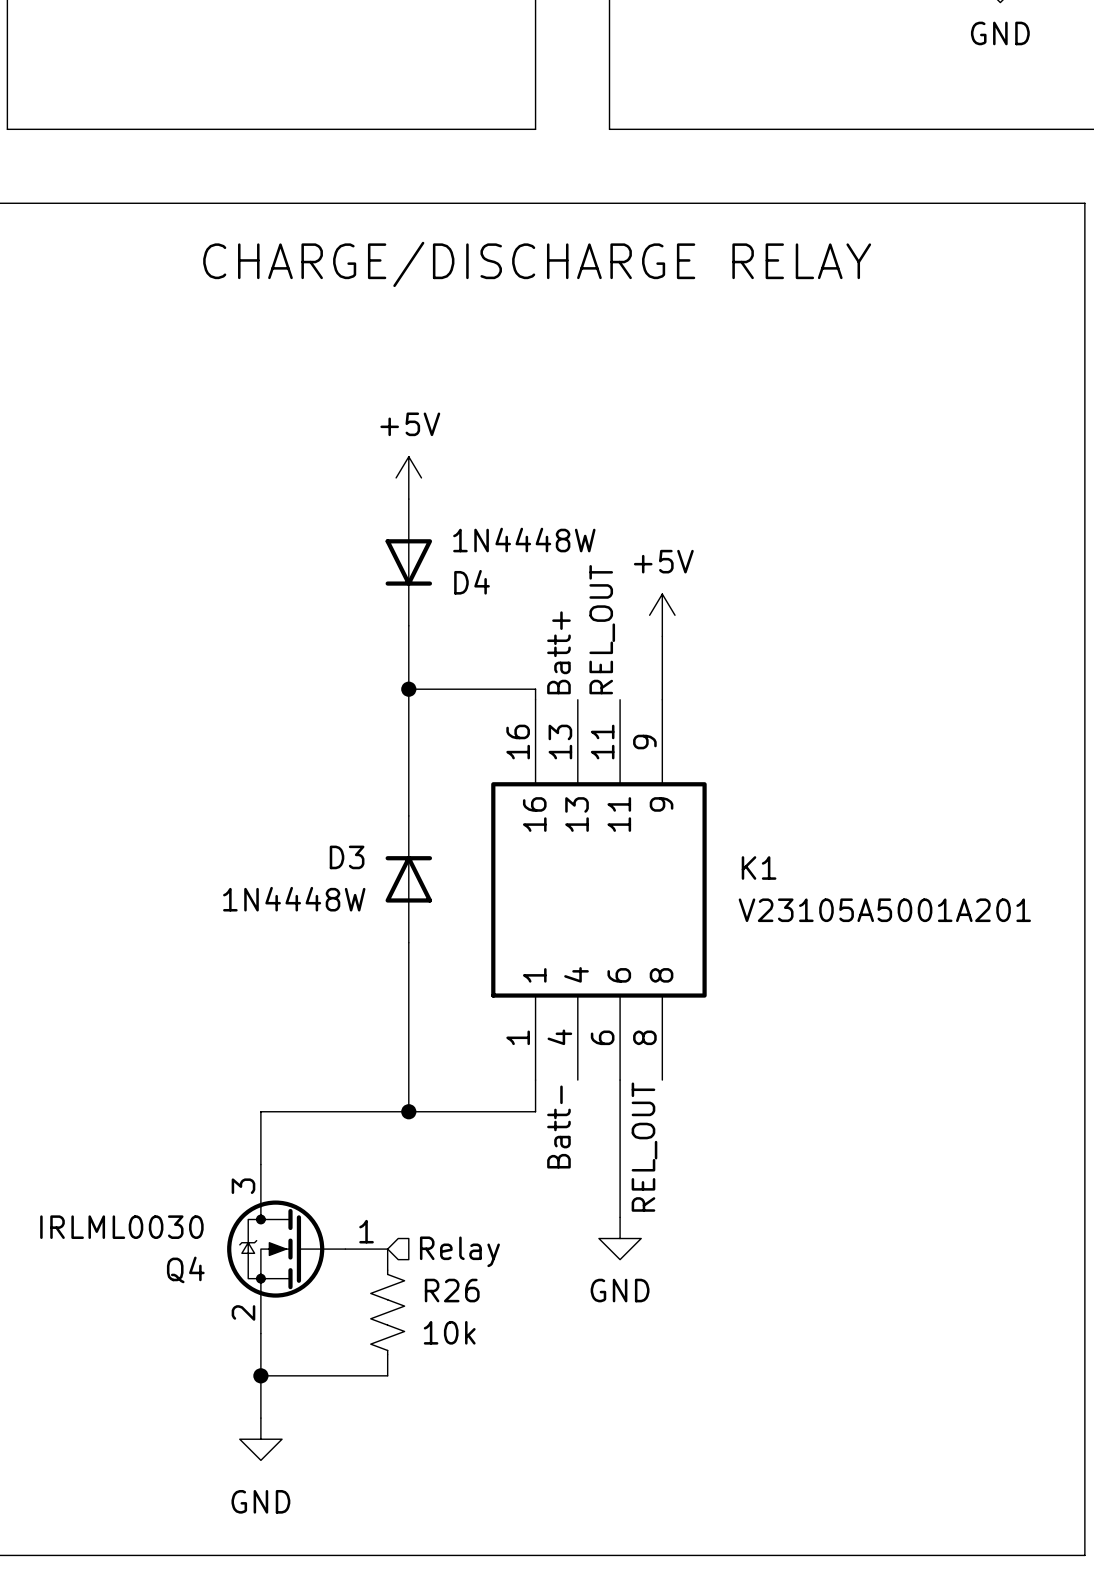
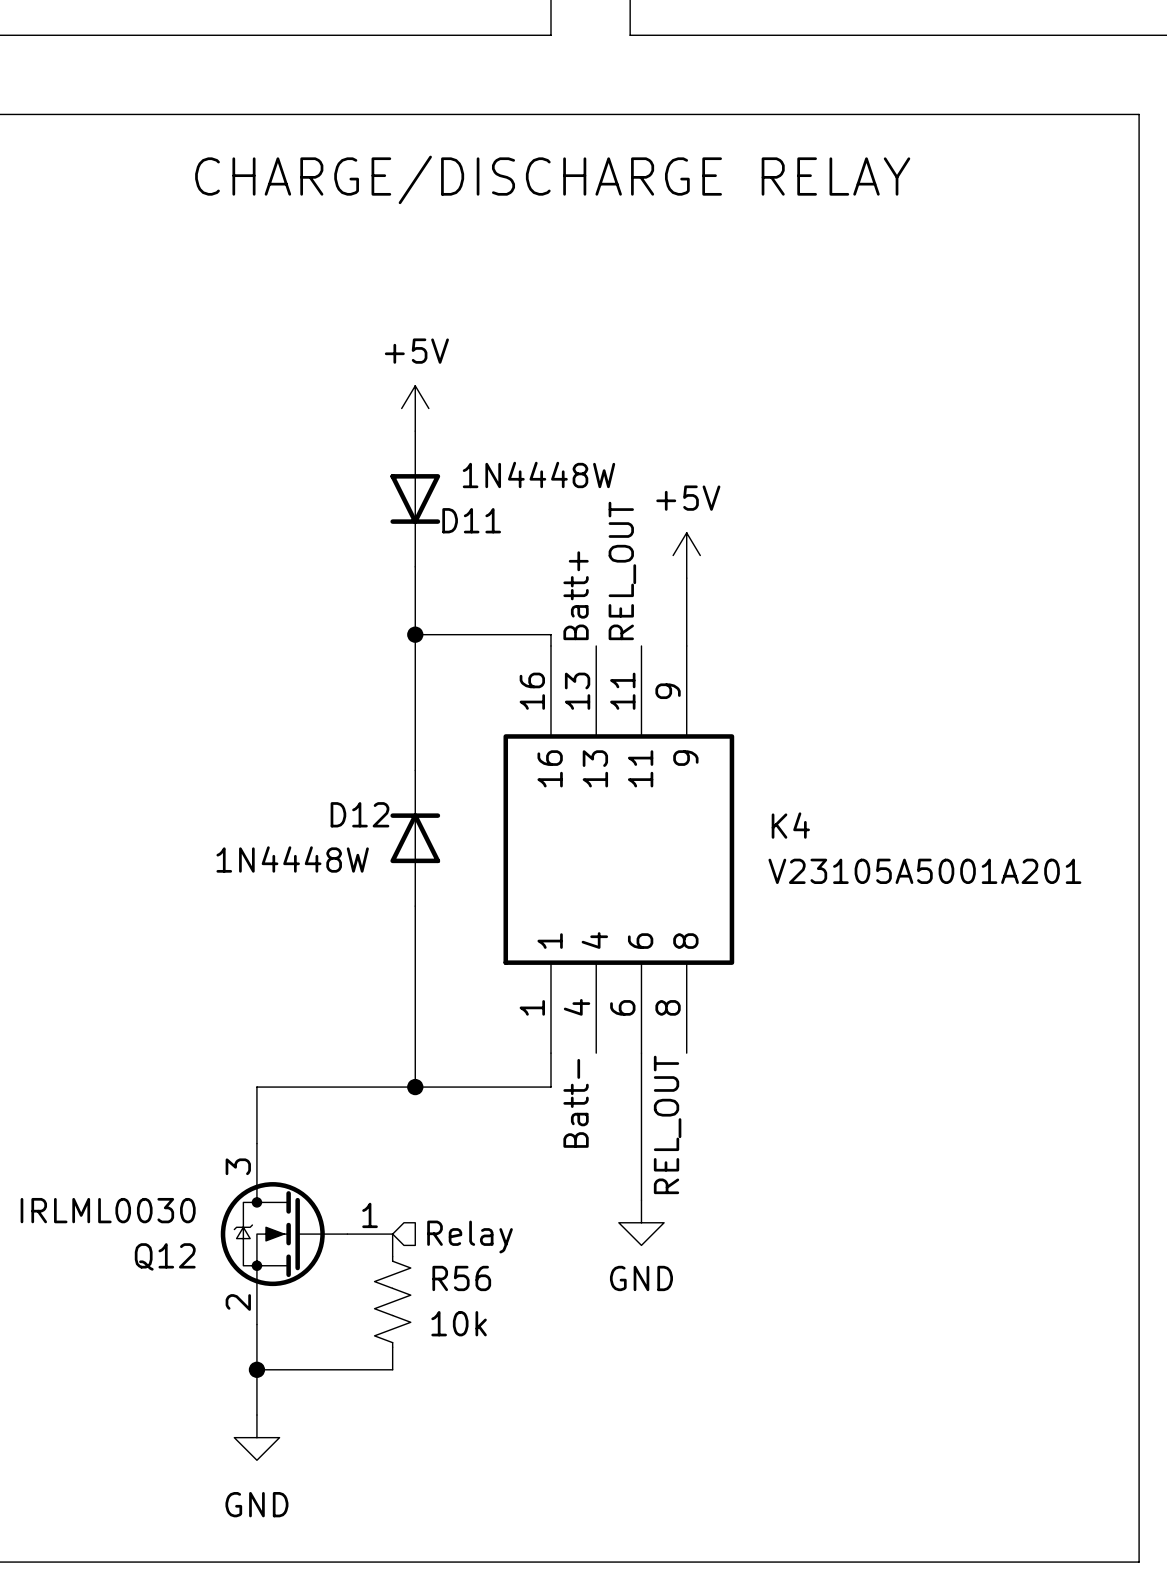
D4 name: D4 (472, 582) -> D11 (471, 520)
D3 name: D3 (347, 857) -> D12 (359, 814)
K1 name: K1 (759, 867) -> K4 (790, 825)
Q4 name: Q4 (185, 1269) -> Q12 (165, 1256)
R26 name: R26 (452, 1290) -> R56 (461, 1278)

